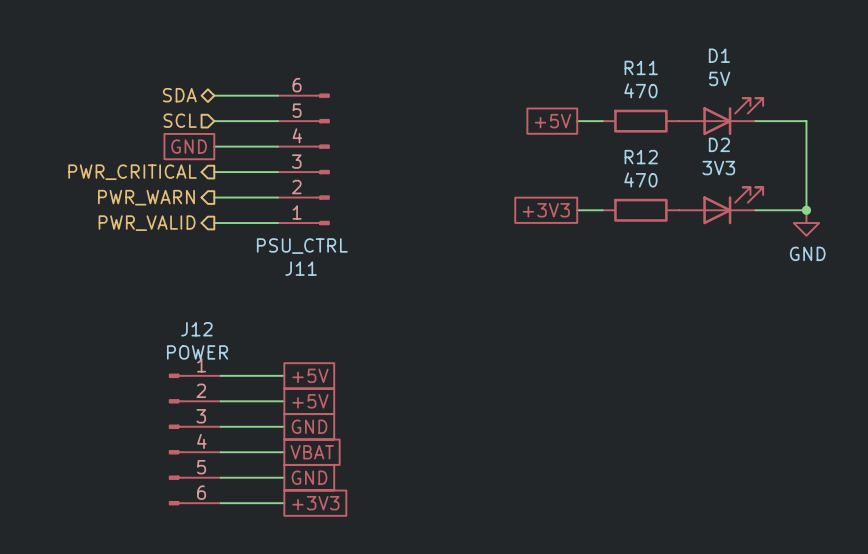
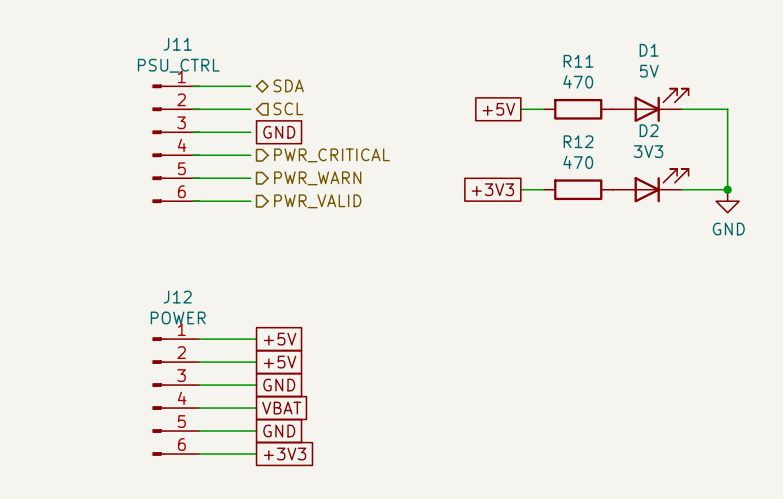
hierarchical label rotation: 0° (179, 95) -> 180° (288, 85)
hierarchical label position: SDA (179, 95) -> SDA (288, 85)
hierarchical label rotation: 0° (180, 120) -> 180° (288, 108)
hierarchical label position: SCL (180, 120) -> SCL (288, 108)
global label rotation: 0° (189, 146) -> 180° (279, 132)
global label position: GND (189, 146) -> GND (279, 132)
J11 position: (303, 159) -> (175, 143)
J11 rotation: 0° (322, 159) -> 180° (158, 143)
hierarchical label rotation: 0° (132, 172) -> 180° (331, 155)
hierarchical label position: PWR_CRITICAL (132, 172) -> PWR_CRITICAL (331, 155)
hierarchical label rotation: 0° (146, 197) -> 180° (317, 178)
hierarchical label position: PWR_WARN (146, 197) -> PWR_WARN (317, 178)
hierarchical label rotation: 0° (147, 223) -> 180° (317, 201)
hierarchical label position: PWR_VALID (147, 223) -> PWR_VALID (317, 201)

